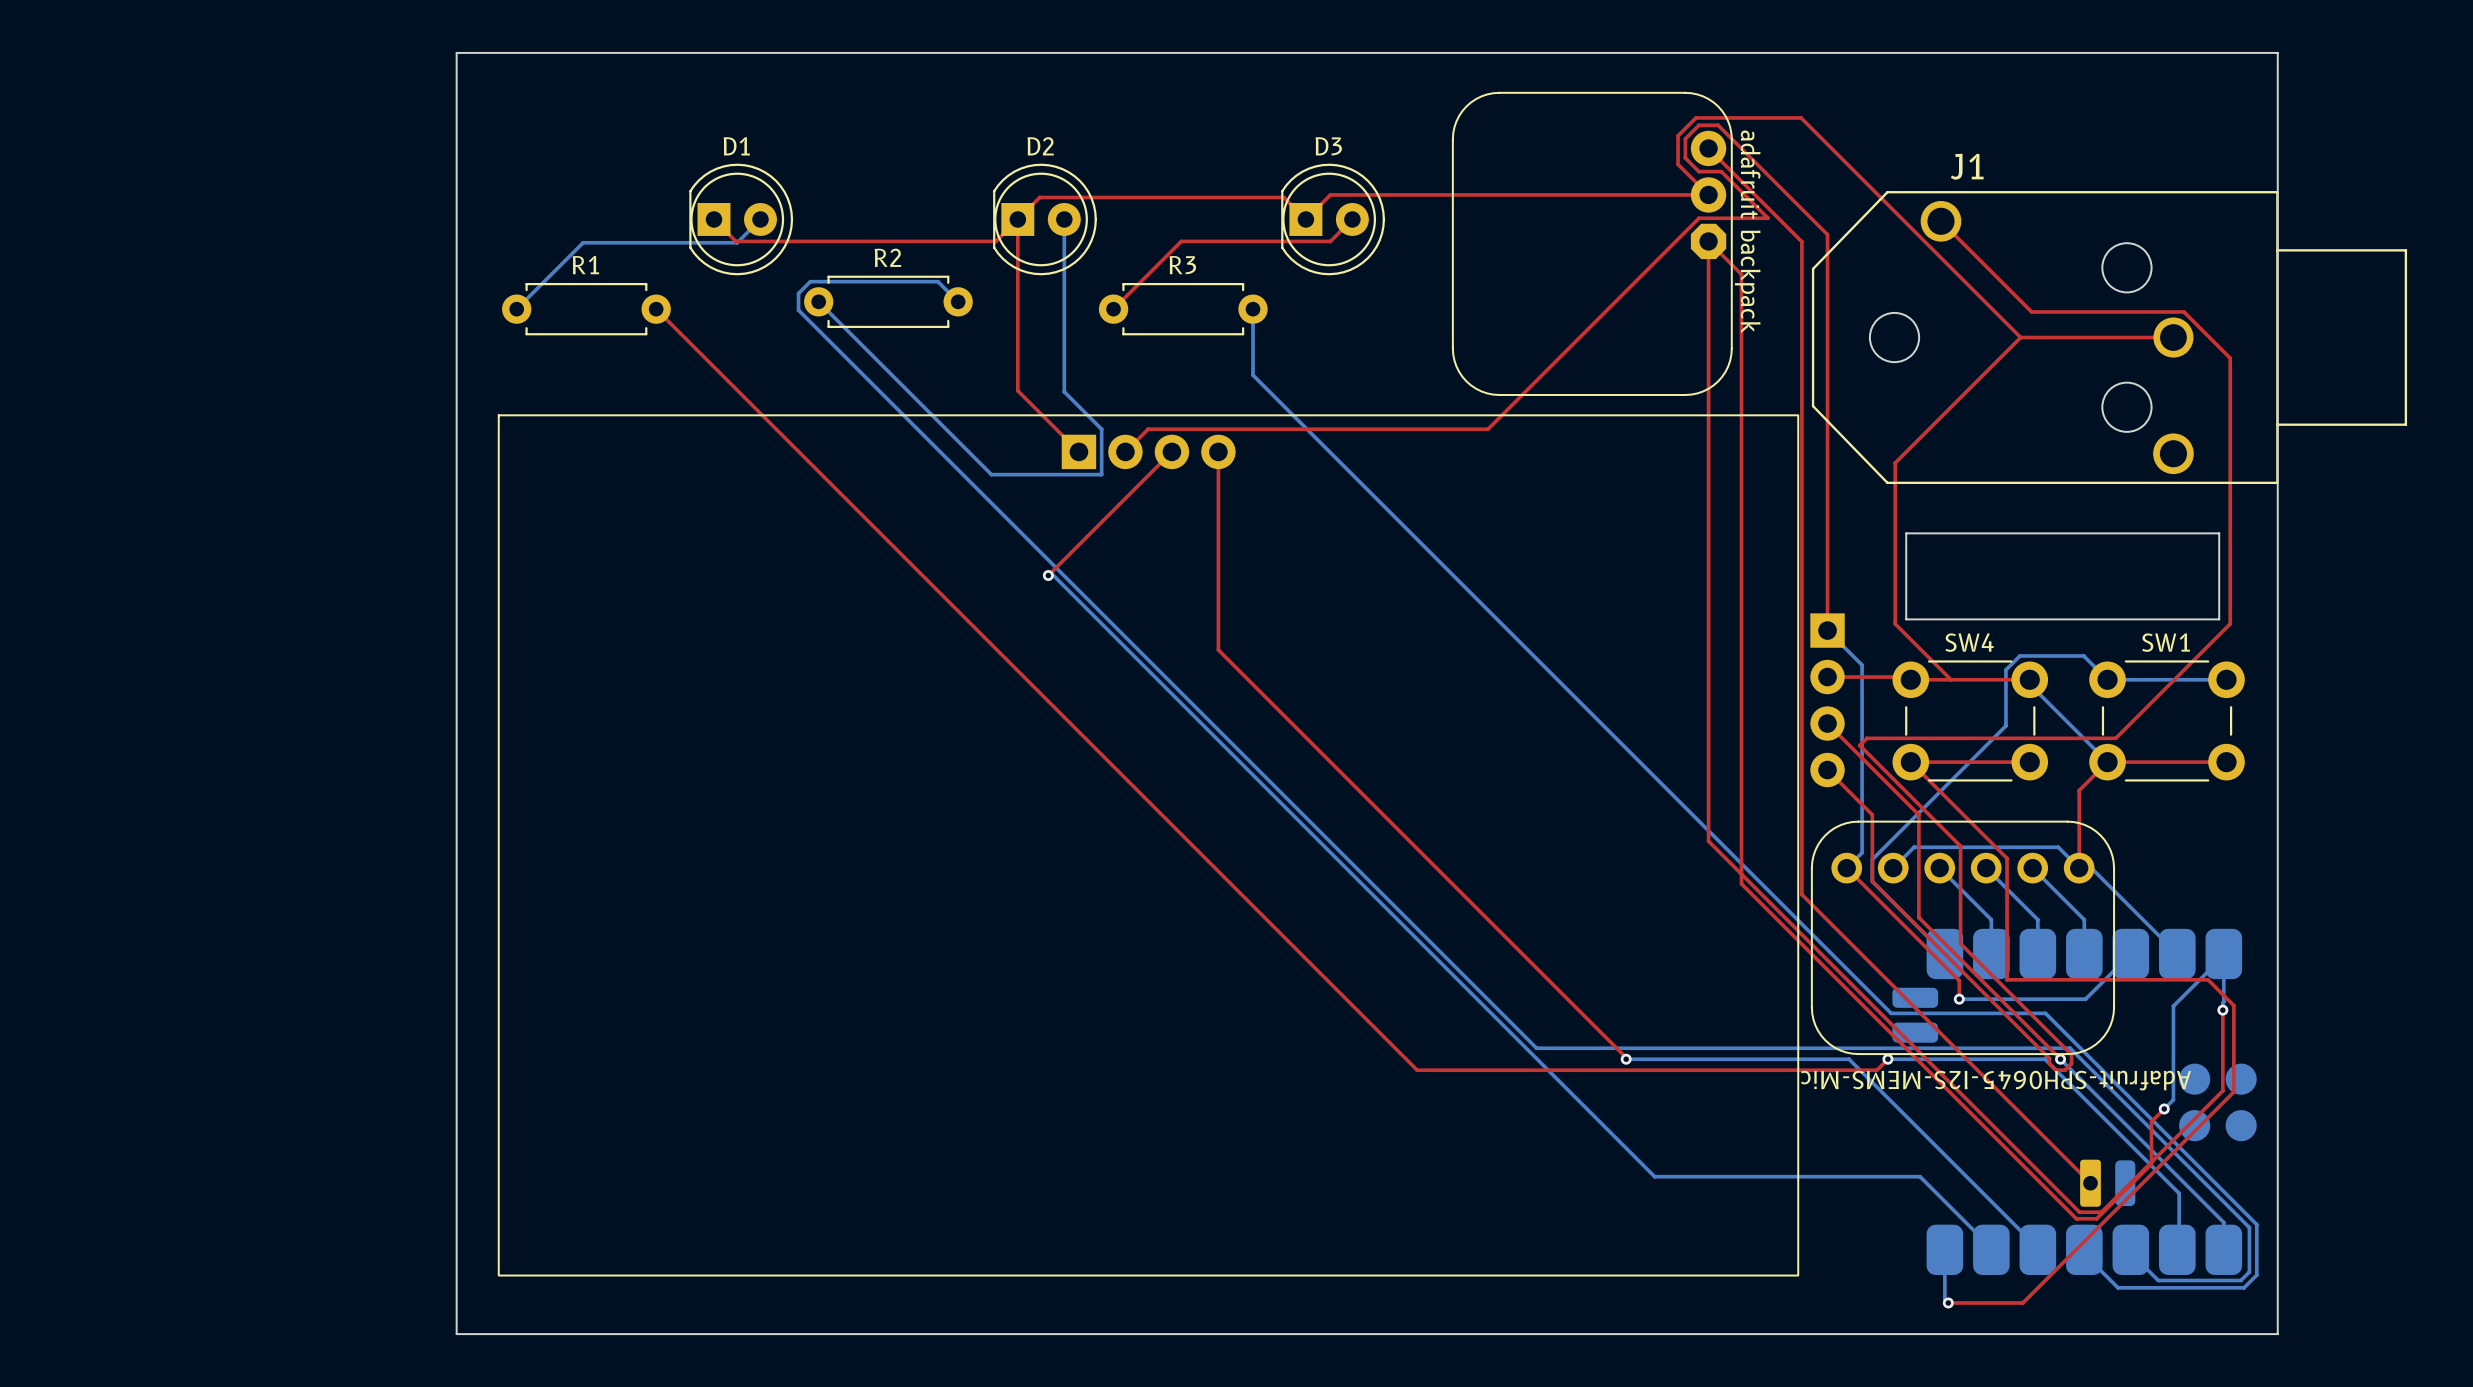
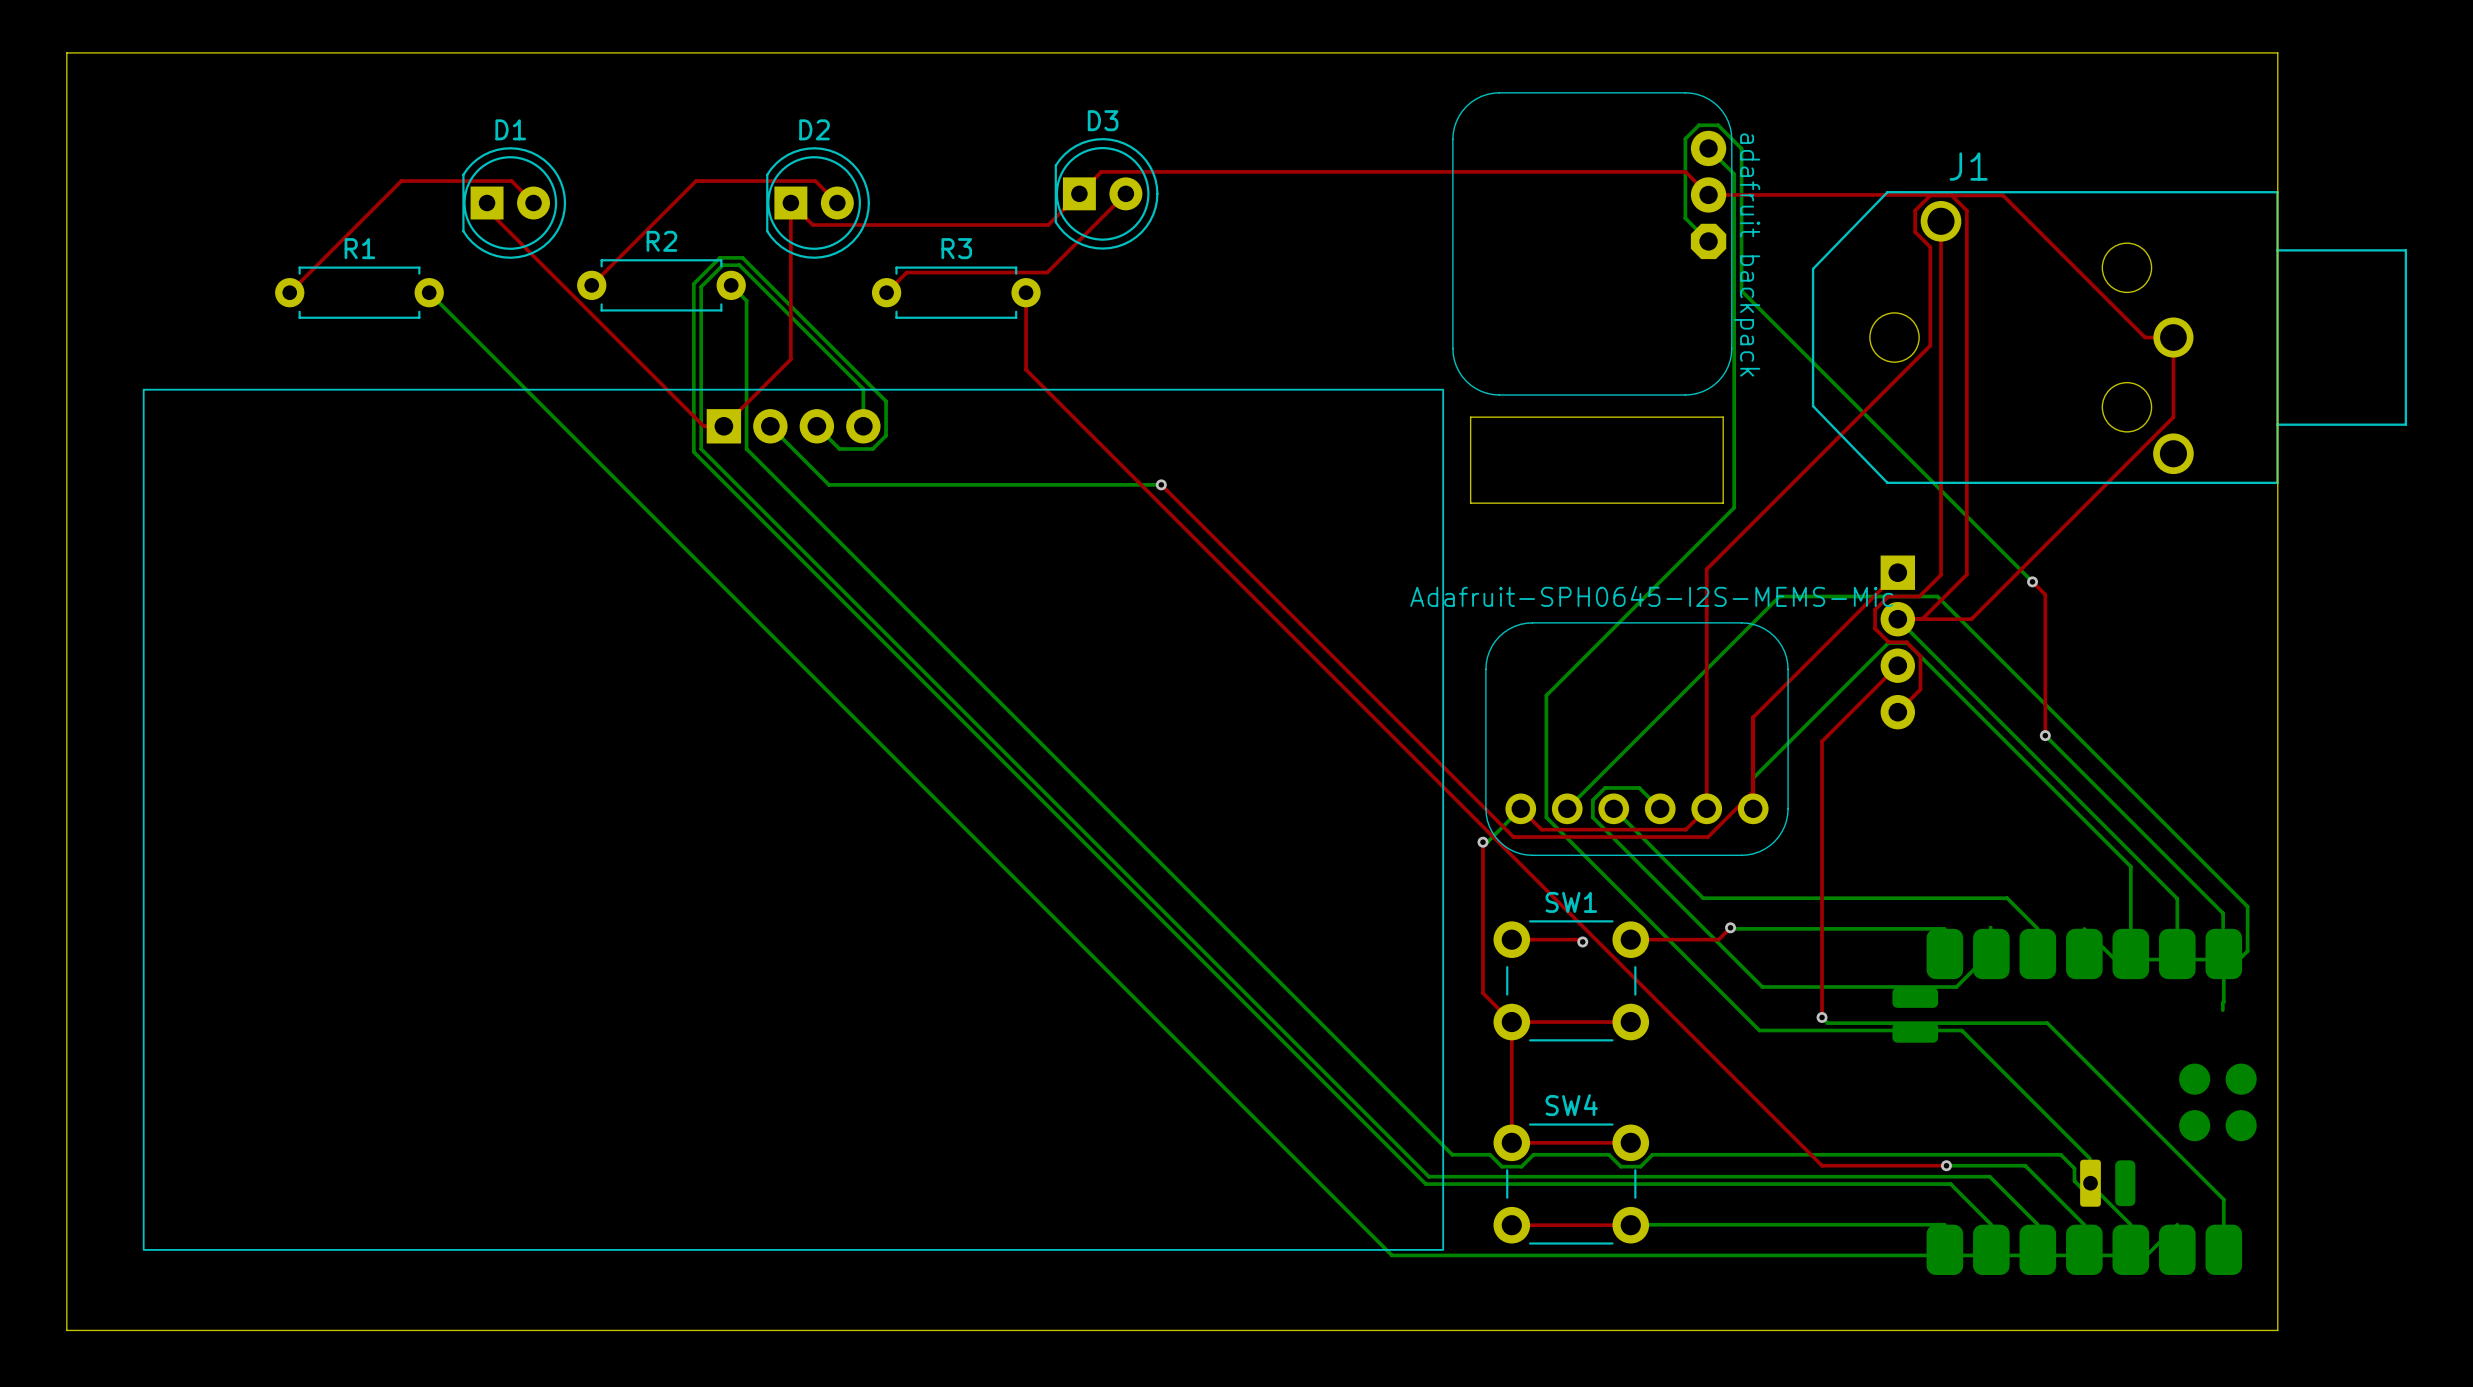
board edge: (456, 52) (456, 1334) (2277, 1334) (2277, 1330) -> (456, 52) (66, 52) (66, 1330) (2277, 1330)
top track: (1708, 148) (1801, 241) (1801, 894) (2090, 1183) -> none
bottom track: none -> (1708, 148) (1734, 174) (1734, 507) (1546, 695) (1546, 817) (1759, 1030) (1961, 1030) (2090, 1158)
top track: (1685, 171) (1678, 164) (1678, 135) (1695, 117) (1801, 117) (1915, 232) -> (1685, 171) (1101, 171) (1048, 224) (812, 224) (790, 203) (790, 359) (723, 426) (703, 426) (487, 209) (487, 203)
top track: none -> (1125, 193) (1047, 272) (906, 272) (886, 292)
top track: (1708, 194) (1330, 194) (1305, 219) (1283, 197) (1039, 197) (995, 241) (735, 241) (714, 219) -> (1708, 194) (1951, 194) (1966, 210) (1966, 574) (1922, 619)
top track: none -> (533, 203) (511, 181) (401, 181) (289, 292)
top track: none -> (837, 203) (815, 181) (696, 181) (591, 285)
D1 position: (741, 219) -> (514, 203)
bottom track: (760, 219) (737, 242) (583, 242) (516, 309) -> none
top track: (1017, 219) (1017, 390) (1078, 451) -> none
D2 position: (1045, 219) -> (818, 203)
bottom track: (1064, 219) (1064, 391) (1101, 429) (1101, 474) (991, 474) (818, 301) -> none
D3 position: (1333, 219) -> (1106, 193)
top track: (1352, 219) (1330, 241) (1181, 241) (1113, 309) -> none
top track: (1941, 221) (2031, 311) (2184, 311) (2230, 358) (2230, 623) (2115, 738) (1866, 738) (1859, 745) (1960, 846) (1960, 943) (2071, 1054) (2071, 1063) (2065, 1070) (2055, 1070) (2049, 1063) (2049, 1058) (1872, 881) (1872, 814) (1827, 770) -> (1941, 221) (1941, 574) (1919, 596) (1888, 596) (1875, 609) (1875, 628) (1888, 642) (1906, 642) (1920, 656) (1920, 689) (1897, 712)
bottom track: none -> (1708, 241) (1685, 218) (1685, 138) (1698, 125) (1718, 125) (1741, 148) (1741, 290) (2032, 581)
top track: (1930, 247) (2020, 337) -> (1930, 247) (1930, 345) (1706, 569) (1706, 808) (1685, 829) (1541, 829) (1520, 808)
bottom track: none -> (731, 285) (746, 300) (746, 449) (1452, 1154) (1490, 1154) (1501, 1166) (1521, 1166) (1533, 1154) (1608, 1154) (1620, 1166) (1640, 1166) (1652, 1154) (2060, 1154) (2074, 1168) (2074, 1181) (2080, 1187) (2093, 1187) (2130, 1224)
bottom track: none -> (429, 292) (1391, 1255) (2146, 1255) (2177, 1224)
top track: none -> (1026, 292) (1026, 369) (1822, 1165) (1946, 1165)
R2 position: (888, 301) -> (661, 285)
bottom track: (958, 301) (938, 281) (810, 281) (798, 293) (798, 310) (1536, 1048) (2070, 1048) (2249, 1227) (2249, 1272) (2240, 1280) (2158, 1280) (2132, 1254) (2132, 1249) -> none
R1 position: (586, 309) -> (359, 292)
top track: (656, 309) (1417, 1070) (1876, 1070) (1887, 1059) -> none
R3 position: (1183, 309) -> (956, 292)
bottom track: (1253, 309) (1253, 375) (1891, 1013) (2045, 1013) (2256, 1224) (2256, 1275) (2244, 1287) (2118, 1287) (2086, 1255) (2086, 1249) -> none
top track: (2020, 337) (2145, 337) -> (1915, 232) (1915, 210) (1930, 195) (2003, 195) (2145, 337)
top track: (2020, 337) (1895, 463) (1895, 623) (1951, 679) -> none
top track: none -> (2173, 337) (2173, 417) (1971, 619) (1897, 619)
board edge: none -> (1470, 417) (1723, 417) (1723, 503) (1470, 503) (1470, 417)
bottom track: none -> (770, 426) (828, 484) (1161, 484)
bottom track: none -> (816, 426) (839, 449) (872, 449) (886, 435) (886, 401) (742, 257) (719, 257) (693, 283) (693, 452) (1425, 1184) (1950, 1184) (1991, 1224)
top track: (1125, 451) (1148, 429) (1488, 429) (1698, 218) (1767, 218) (1721, 171) (1698, 171) (1685, 158) (1685, 138) (1698, 125) (1718, 125) (1827, 234) (1827, 630) -> none
top track: (1171, 451) (1048, 575) -> none
top track: (1218, 451) (1218, 649) (1626, 1059) -> none
top track: none -> (1161, 484) (1513, 837) (1708, 837) (1753, 791)
via: none -> (1161, 484)
board edge: (1906, 533) (2219, 533) (2219, 619) (1906, 619) (1906, 533) -> none
top track: none -> (1897, 572) (1753, 717) (1753, 808)
bottom track: (1048, 575) (1050, 572) (1654, 1176) -> (863, 426) (863, 389) (739, 265) (722, 265) (701, 286) (701, 449) (1428, 1176) (1654, 1176)
via: (1048, 575) -> none
top track: none -> (2032, 581) (2045, 594) (2045, 735)
via: none -> (2032, 581)
bottom track: none -> (1897, 619) (2177, 898) (2177, 928)
bottom track: (1827, 630) (1862, 665) (1862, 852) (1846, 868) -> none
top track: none -> (1897, 665) (1822, 741) (1822, 1017)
top track: (1827, 677) (1908, 677) (1910, 679) (2029, 679) -> none
bottom track: (2029, 679) (2029, 684) (2107, 762) -> none
bottom track: (2226, 679) (2107, 679) (2083, 655) (2019, 655) (2005, 669) (2005, 725) (1872, 859) (1872, 881) (1944, 953) -> none
part position: (1827, 700) -> (1897, 642)
SW4 position: (1970, 720) -> (1571, 1184)
SW1 position: (2167, 720) -> (1571, 980)
top track: (1827, 723) (1918, 814) (1918, 917) (2060, 1059) -> none
bottom track: none -> (2045, 735) (2223, 913) (2223, 927)
via: none -> (2045, 735)
top track: (2029, 762) (1910, 762) (2007, 858) (2007, 979) (2208, 979) (2233, 1005) (2233, 1092) (2022, 1302) (1948, 1302) -> none
top track: (2226, 762) (2107, 762) (2079, 790) (2079, 868) -> none
bottom track: none -> (1520, 808) (1487, 842) (1482, 842)
bottom track: none -> (1567, 808) (1779, 596) (1937, 596) (2247, 906) (2247, 951) (2239, 959) (2115, 959) (2084, 928)
bottom track: none -> (1613, 808) (1703, 898) (2007, 898) (2037, 928)
bottom track: none -> (1660, 808) (1639, 787) (1605, 787) (1592, 800) (1592, 817) (1762, 987) (1956, 987) (1990, 952) (1990, 927)
bottom track: none -> (1753, 808) (1753, 778) (1888, 642) (1907, 642) (2130, 866) (2130, 928)
top track: none -> (1482, 842) (1482, 993) (1511, 1022)
via: none -> (1482, 842)
part position: (1148, 845) -> (793, 819)
top track: (1846, 868) (1959, 980) (1959, 999) -> none
bottom track: (1893, 868) (1914, 847) (2058, 847) (2079, 868) (2091, 868) (2177, 953) -> none
bottom track: (1939, 868) (1991, 919) (1991, 953) -> none
bottom track: (1986, 868) (2037, 919) (2037, 953) -> none
bottom track: (2032, 868) (2084, 919) (2084, 953) -> none
top track: none -> (1730, 927) (1718, 939) (1630, 939)
bottom track: none -> (1730, 927) (1944, 928)
via: none -> (1730, 927)
part rotation: 0° (1962, 937) -> 180° (1636, 739)
part position: (1962, 937) -> (1636, 739)
top track: none -> (1511, 939) (1580, 939) (1582, 941)
via: none -> (1582, 941)
bottom track: (2130, 953) (2085, 999) (1959, 999) -> none
bottom track: (2225, 953) (2173, 1006) (2173, 1099) (2164, 1108) -> none
via: (1959, 999) -> none
top track: (2222, 1010) (2222, 1090) (2101, 1212) (2079, 1212) (1708, 841) (1708, 241) (1741, 274) (1741, 883) (2076, 1218) (2096, 1218) (2151, 1164) (2151, 1121) (2164, 1108) -> none
via: (2222, 1010) -> none
via: none -> (1822, 1017)
top track: none -> (1511, 1022) (1511, 1142) (1630, 1142)
top track: none -> (1511, 1022) (1630, 1022)
bottom track: (1626, 1059) (1849, 1059) (2039, 1249) -> none
via: (1626, 1059) -> none
bottom track: (1887, 1059) (2044, 1059) (2179, 1193) (2179, 1249) -> none
via: (1887, 1059) -> none
bottom track: (2060, 1059) (2223, 1222) -> (1822, 1017) (1827, 1023) (2047, 1023) (2223, 1199) (2223, 1222)
via: (2060, 1059) -> none
via: (2164, 1108) -> none
bottom track: none -> (1946, 1165) (2025, 1165) (2084, 1224)
via: none -> (1946, 1165)
bottom track: (1920, 1176) (1993, 1249) -> (1920, 1176) (1989, 1176) (2037, 1224)
bottom track: none -> (1944, 1224) (1630, 1225)
top track: none -> (1511, 1225) (1630, 1225)
bottom track: (1944, 1249) (1944, 1299) (1948, 1302) -> none
via: (1948, 1302) -> none

